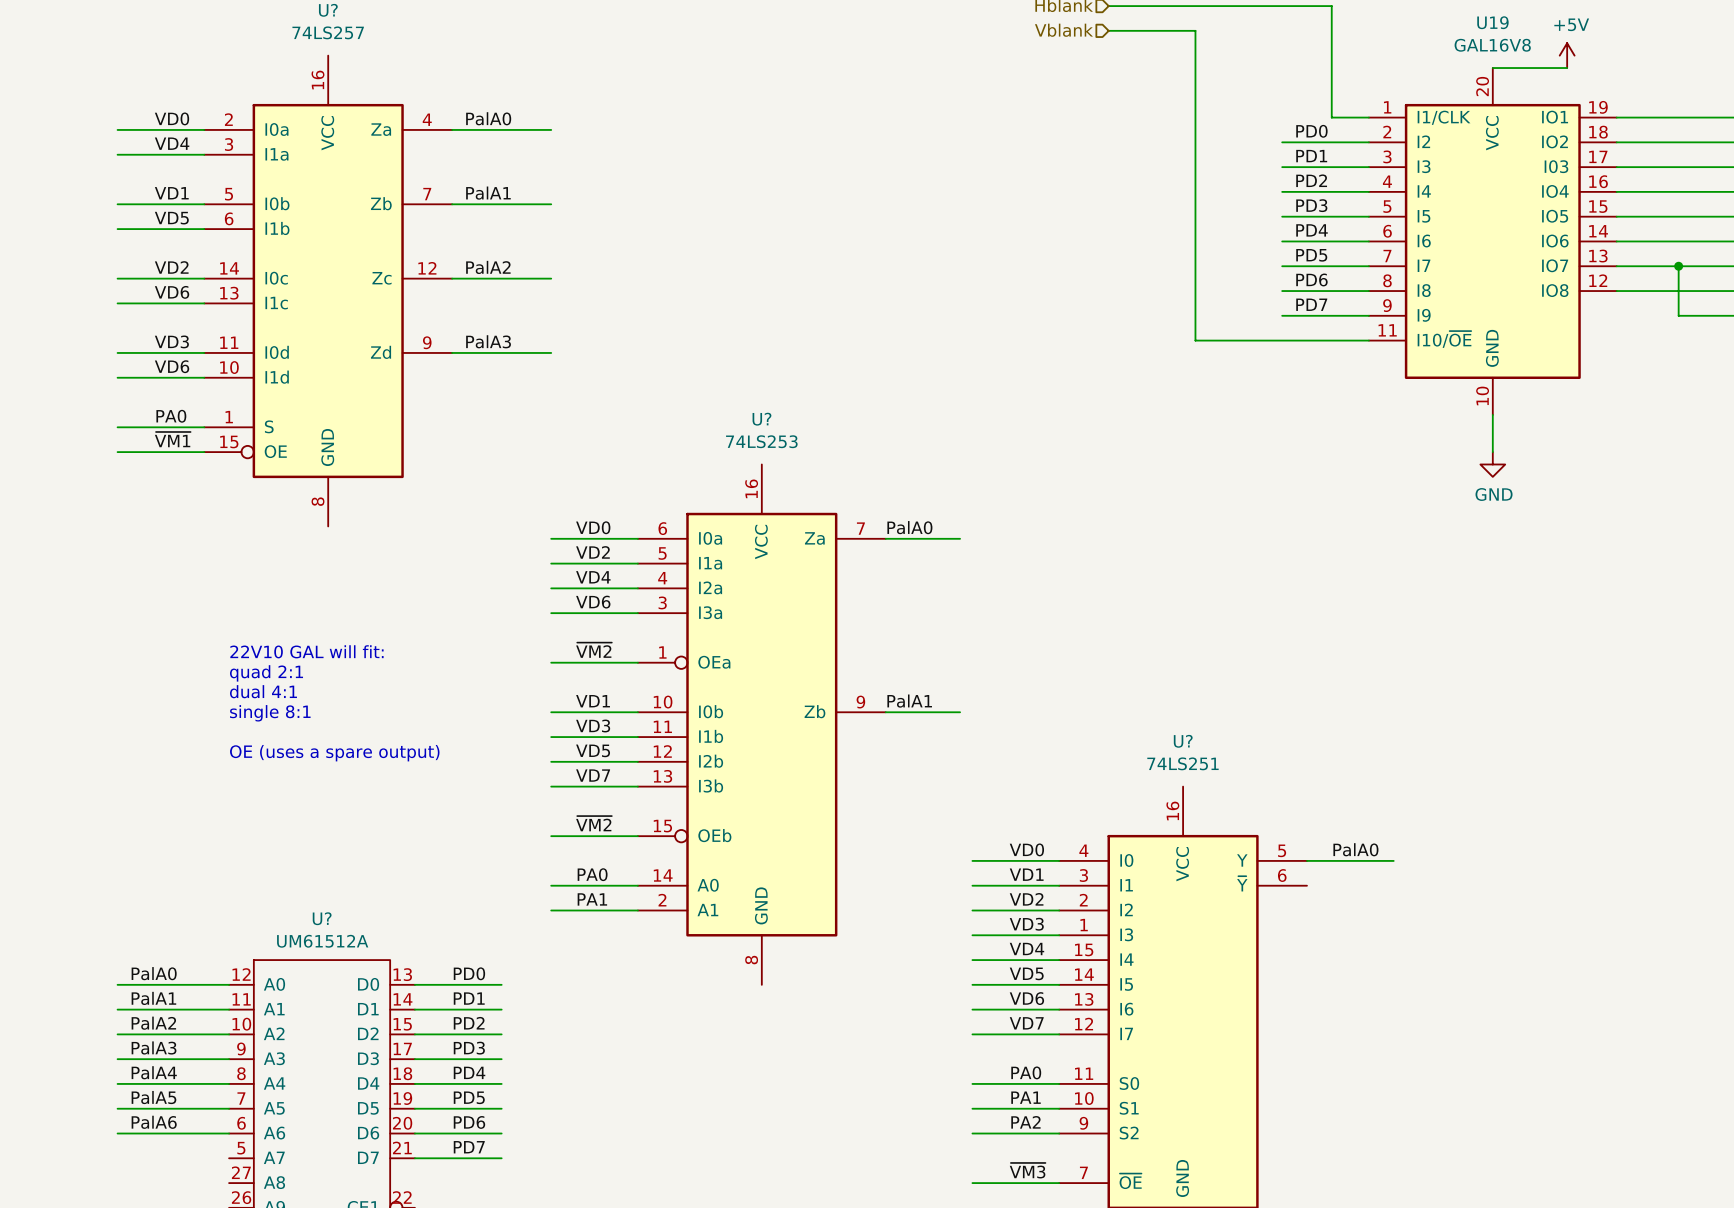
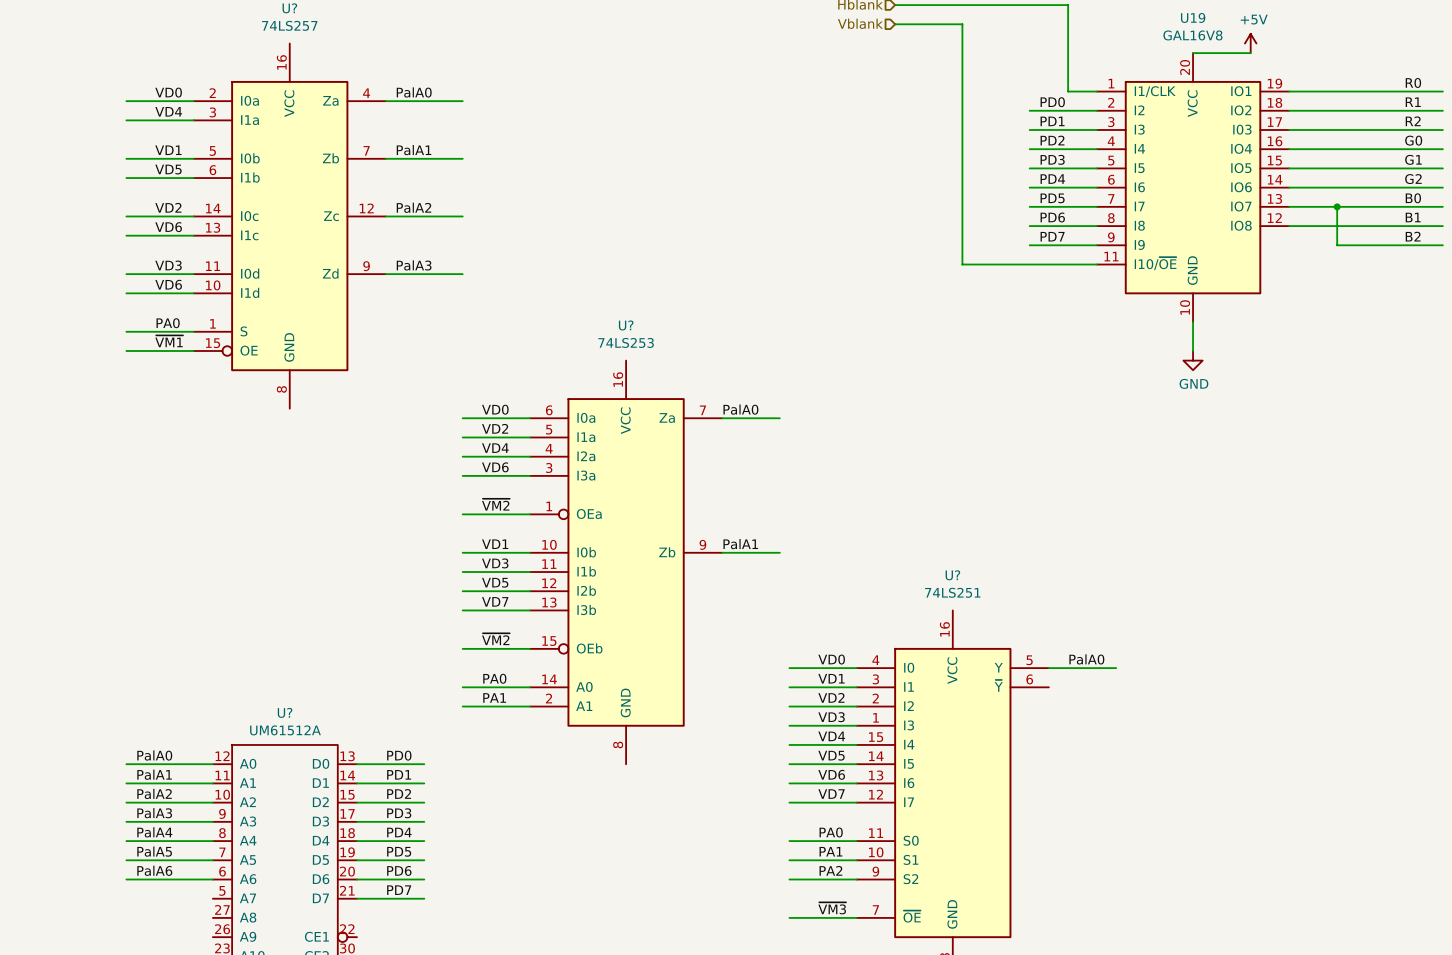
text: 22V10 GAL will fit: (306, 651) -> none
text: quad 2:1 (266, 673) -> none
text: dual 4:1 (263, 691) -> none
text: single 8:1 (270, 713) -> none
text: OE (uses a spare output) (334, 753) -> none

